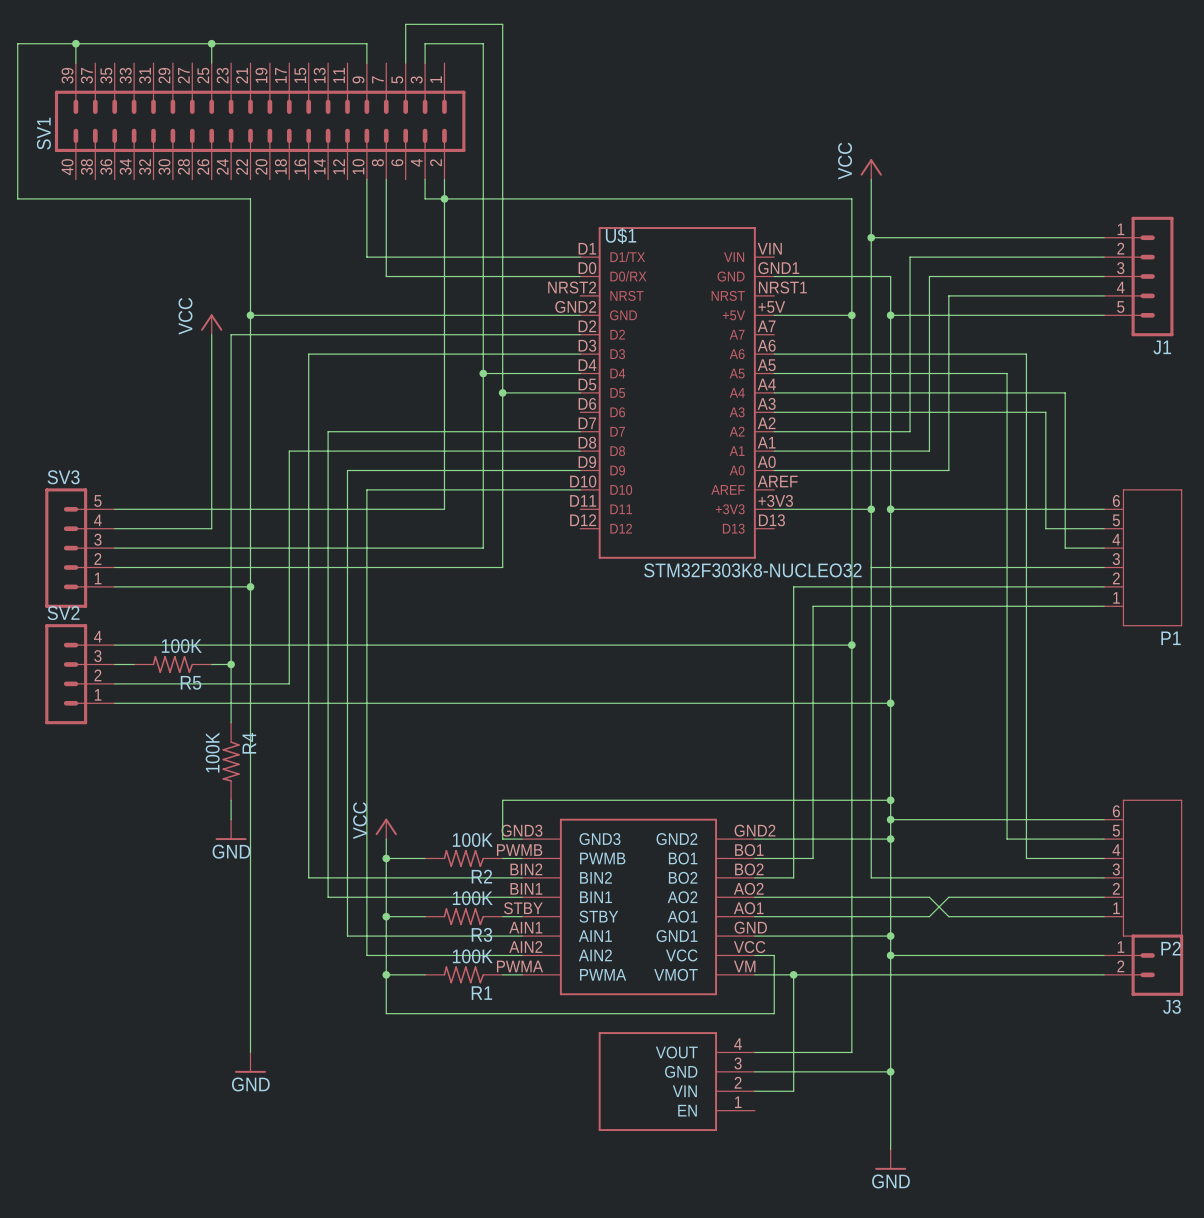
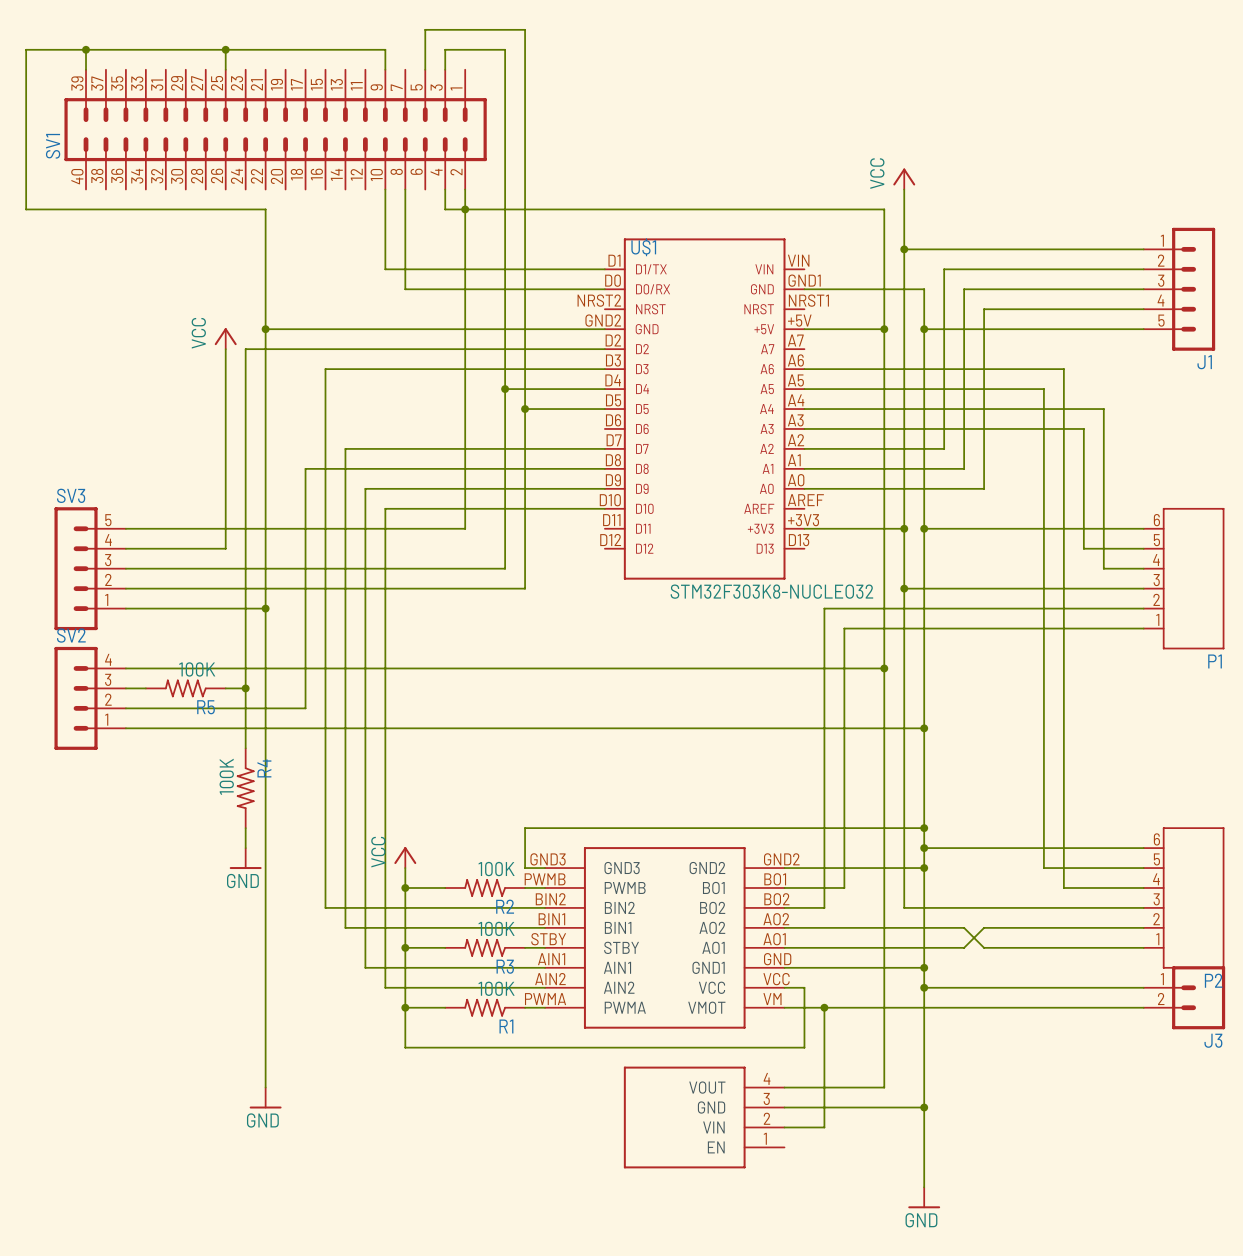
junction: none -> (904, 588)

